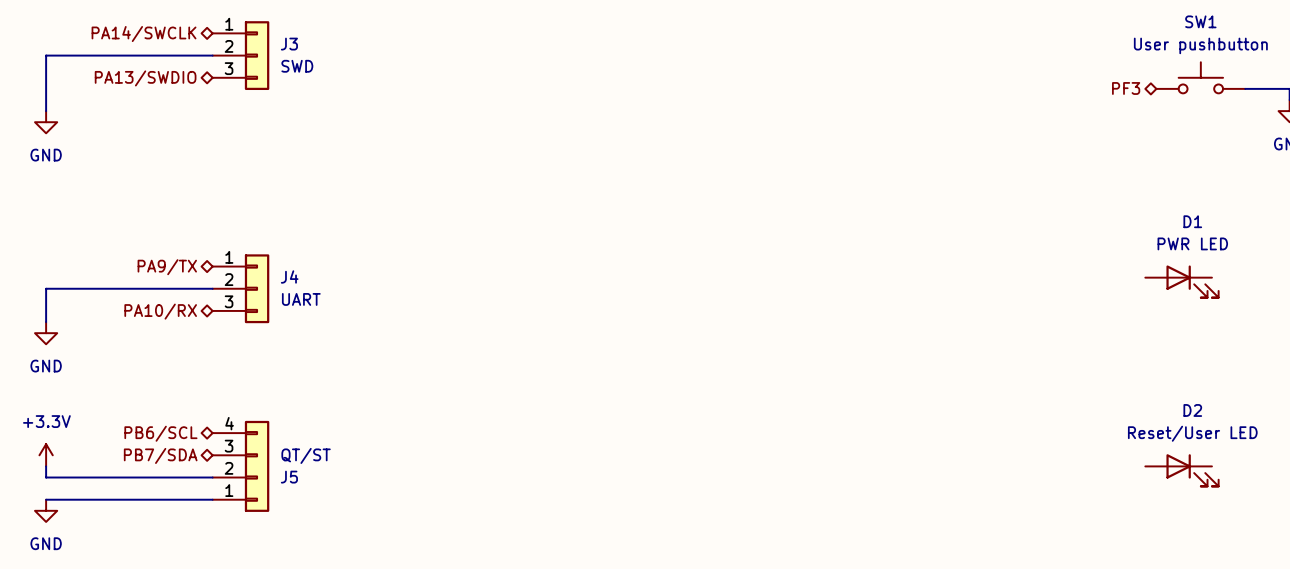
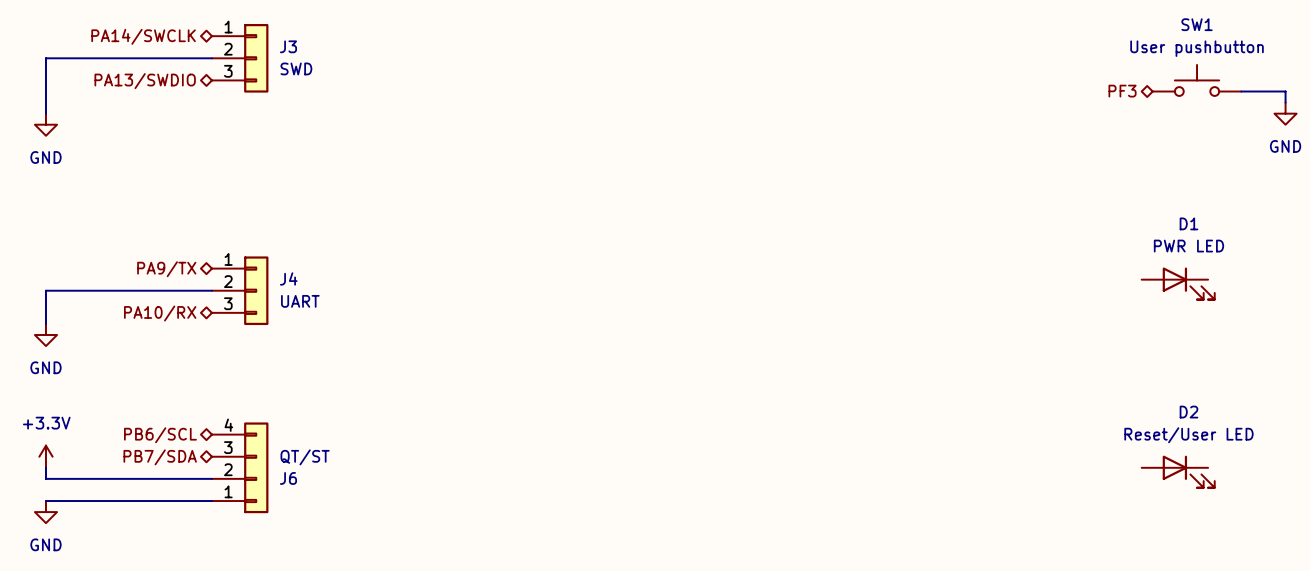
J5 name: J5 (289, 477) -> J6 (288, 478)

